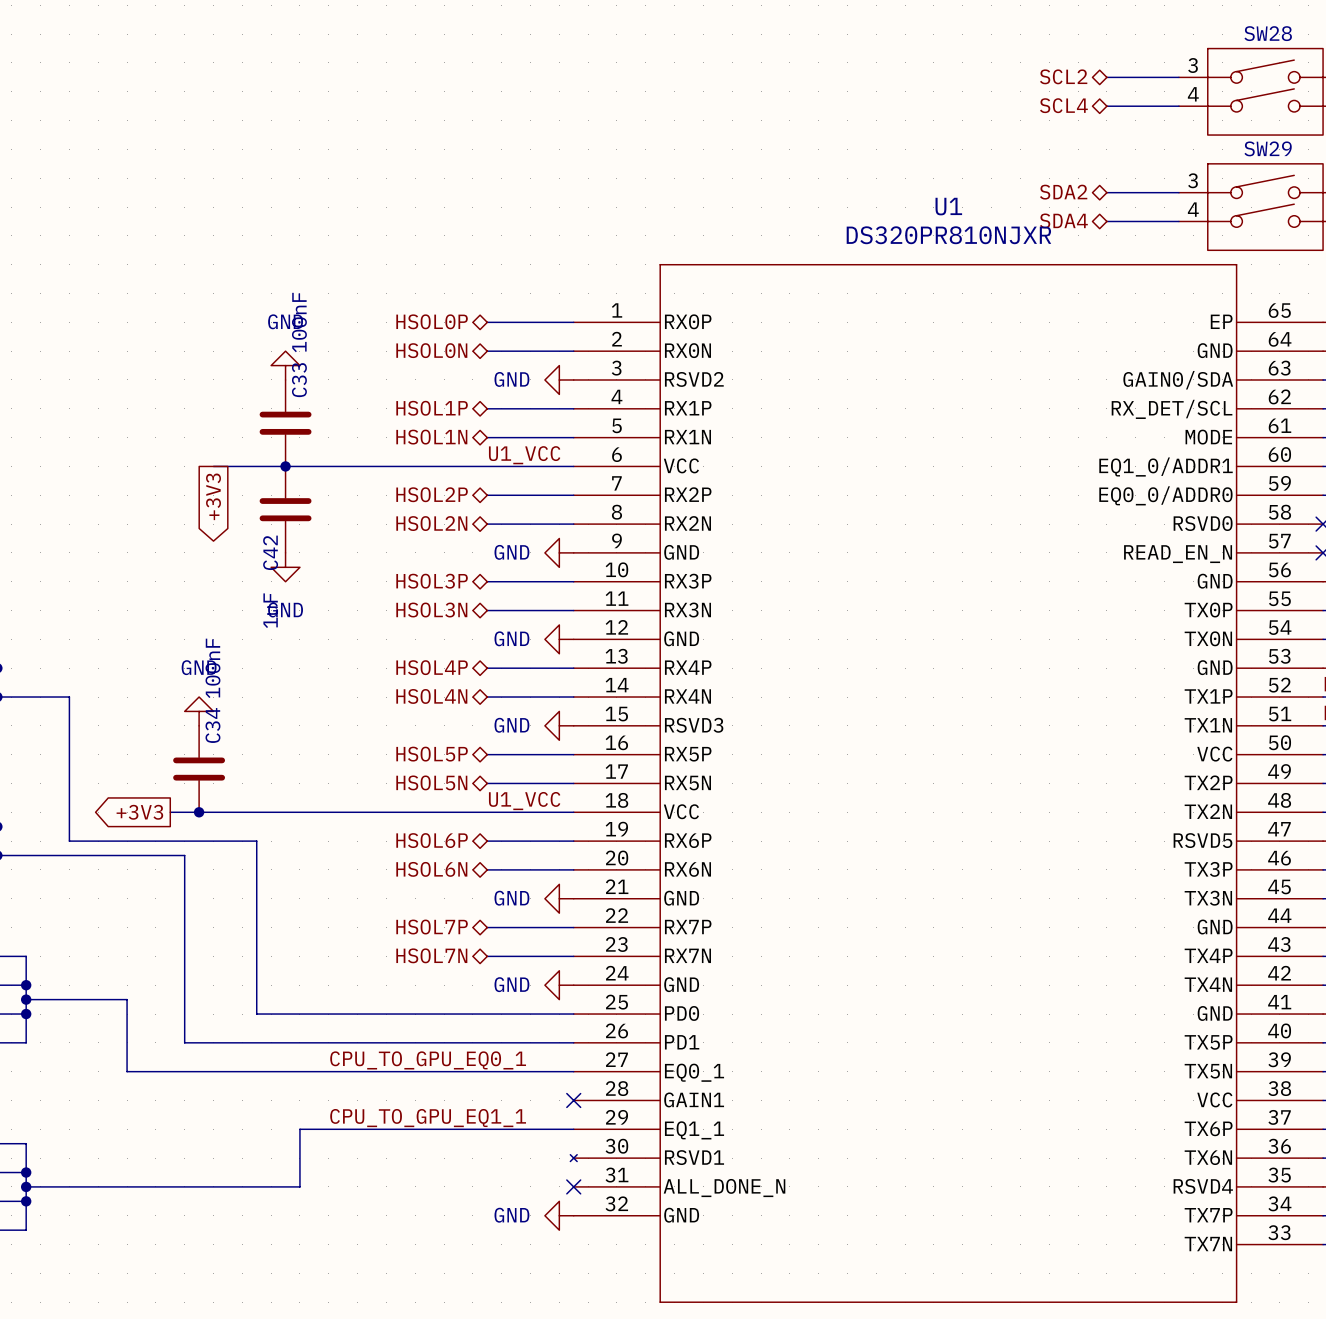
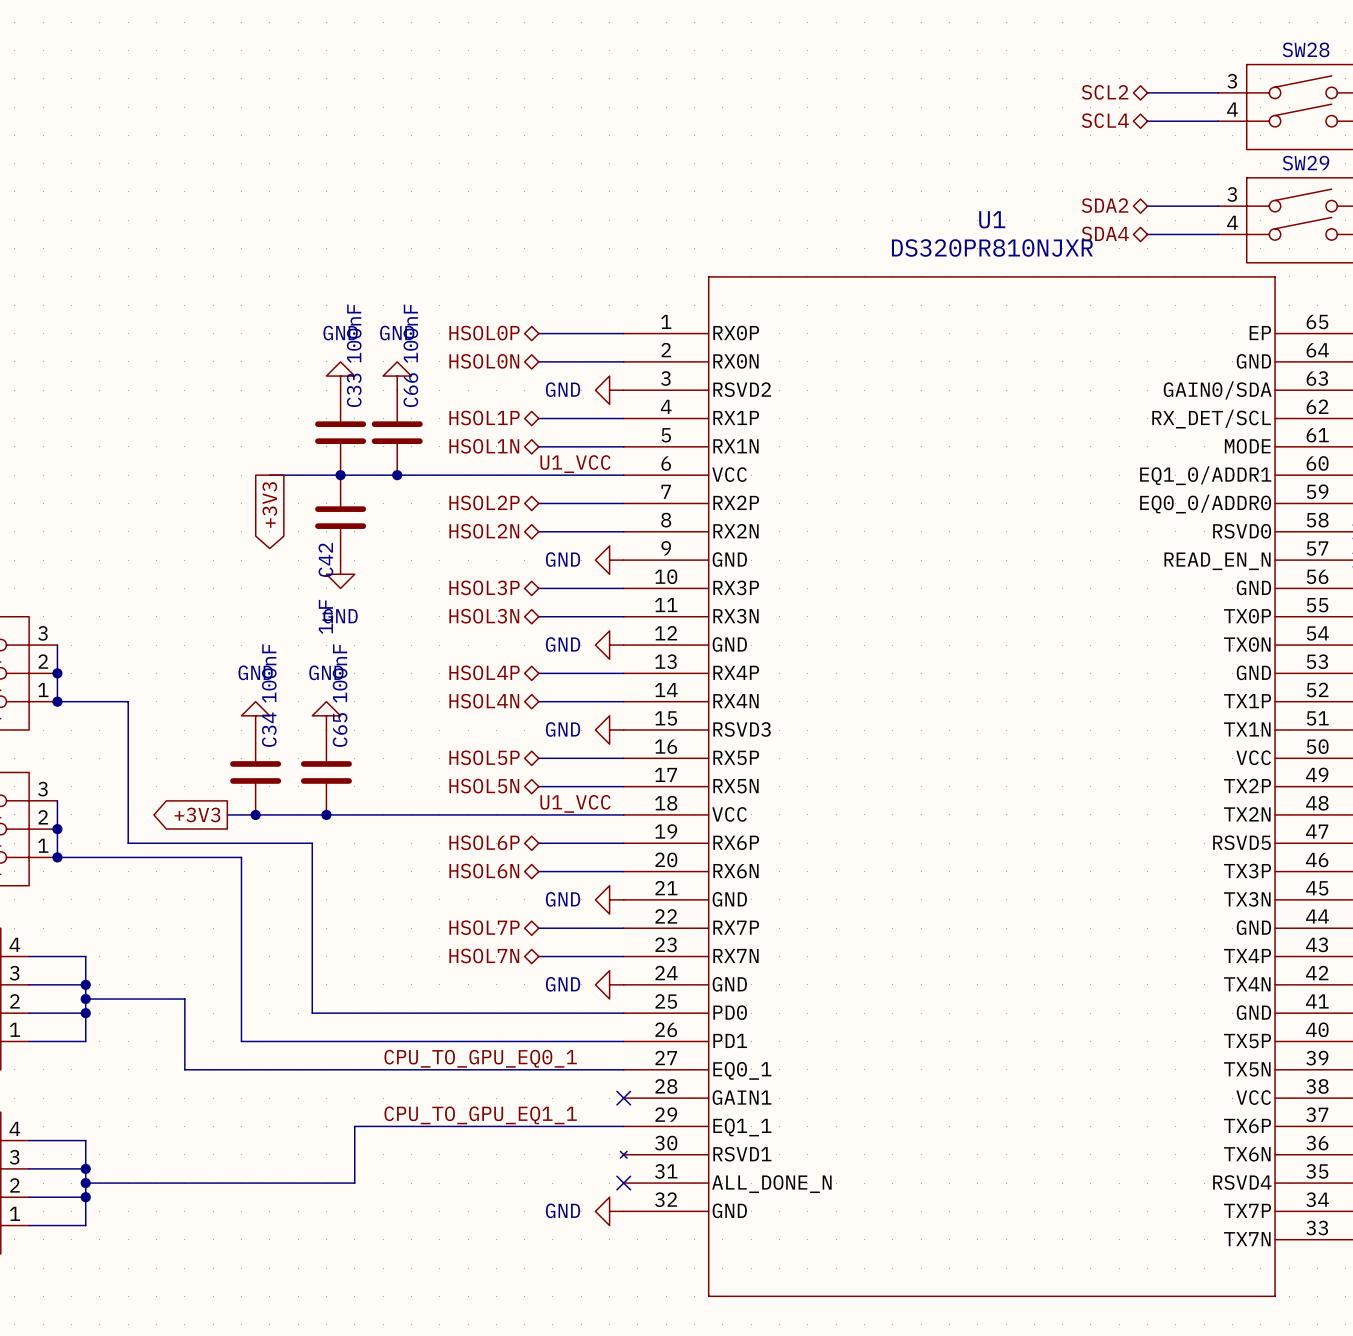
power symbol: none -> GND (397, 376)
C66: none -> 100nF (397, 432)
junction: none -> (397, 475)
power symbol: none -> GND (326, 715)
C65: none -> 100nF (326, 772)
junction: none -> (326, 814)

